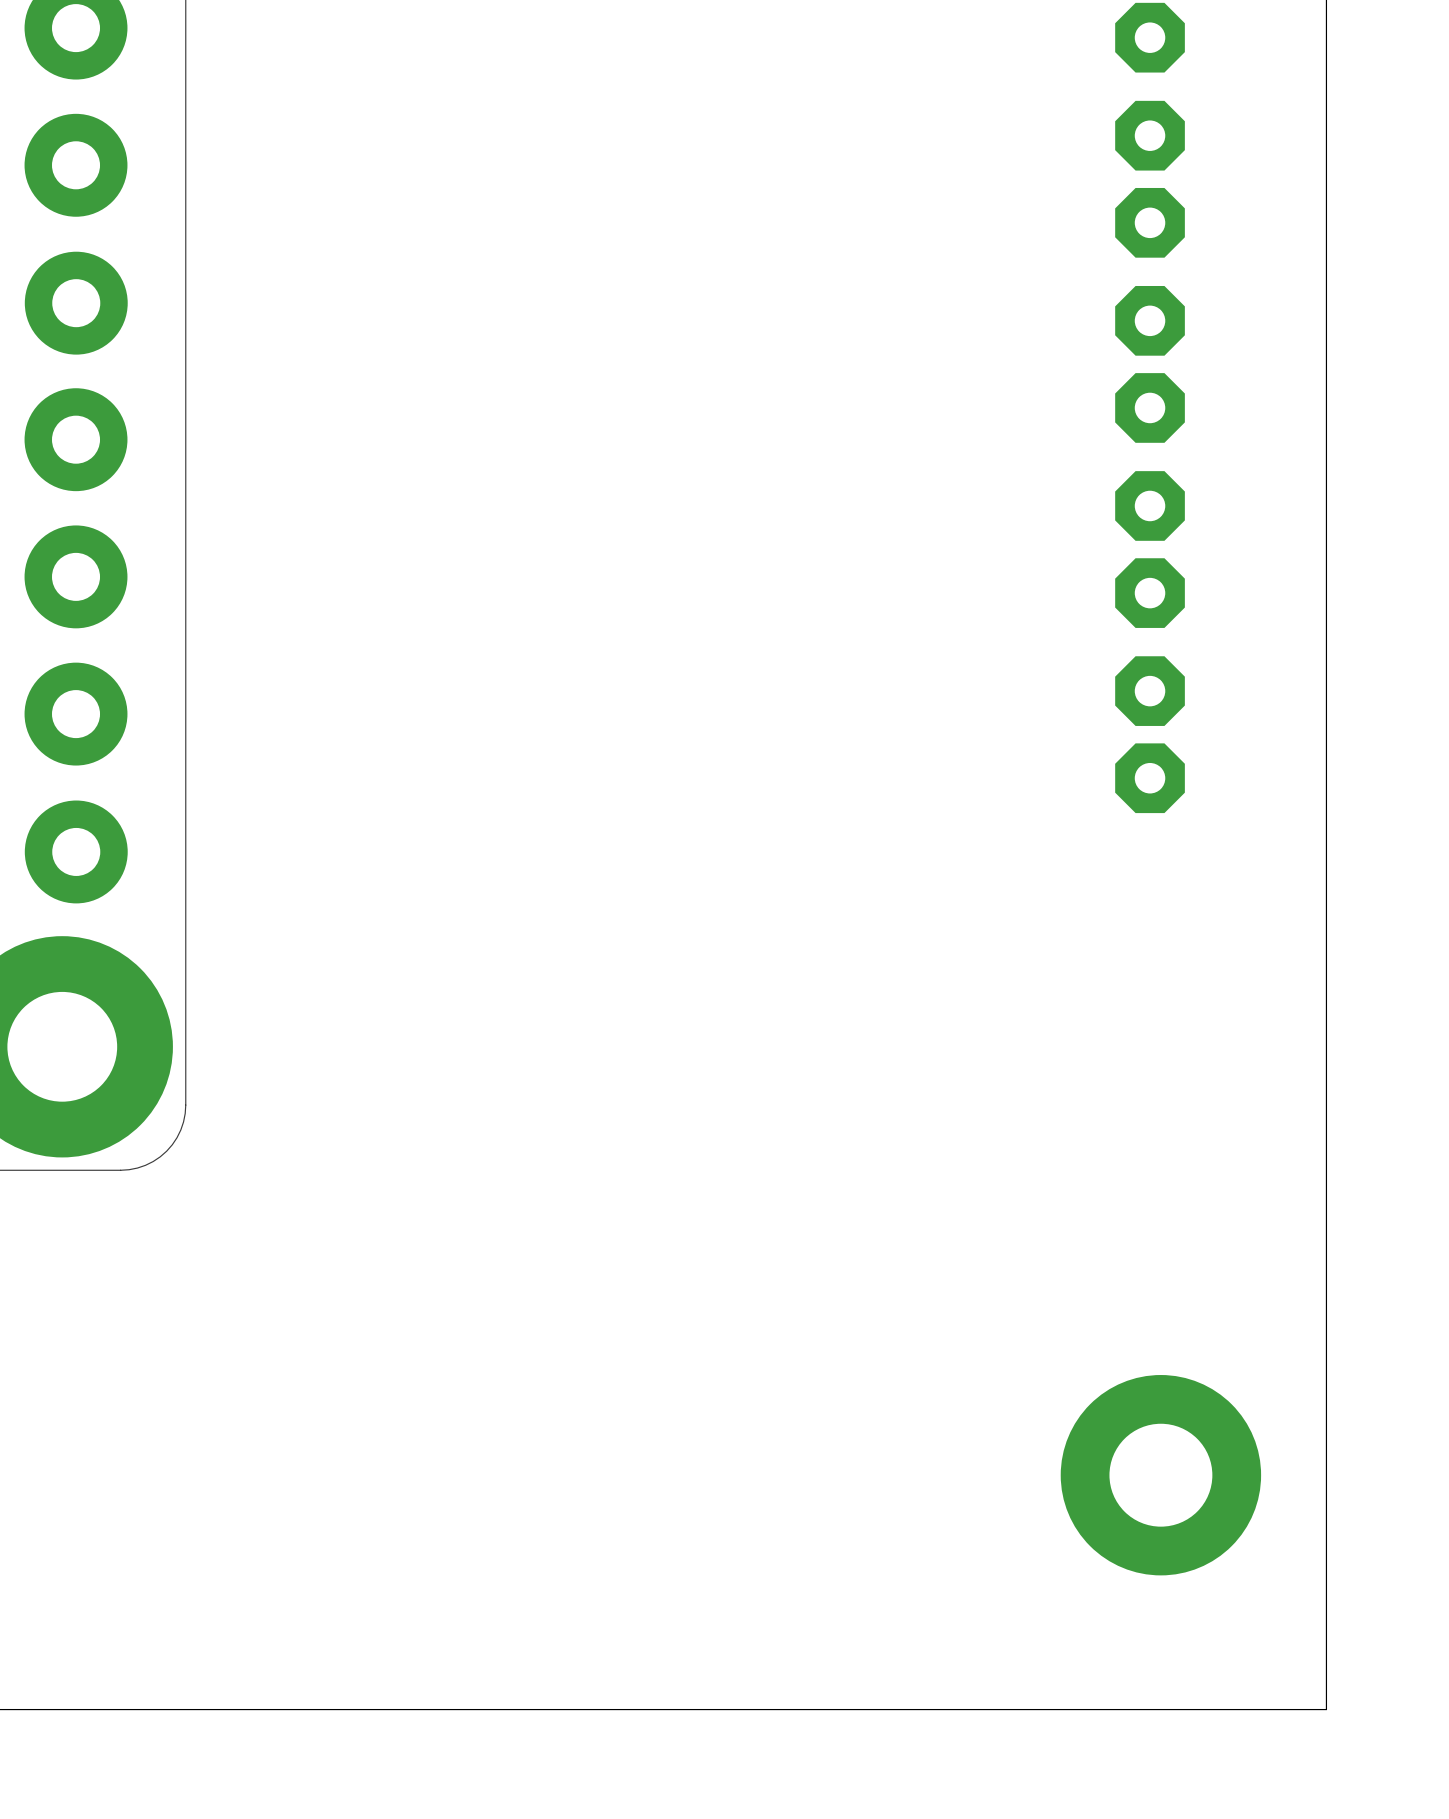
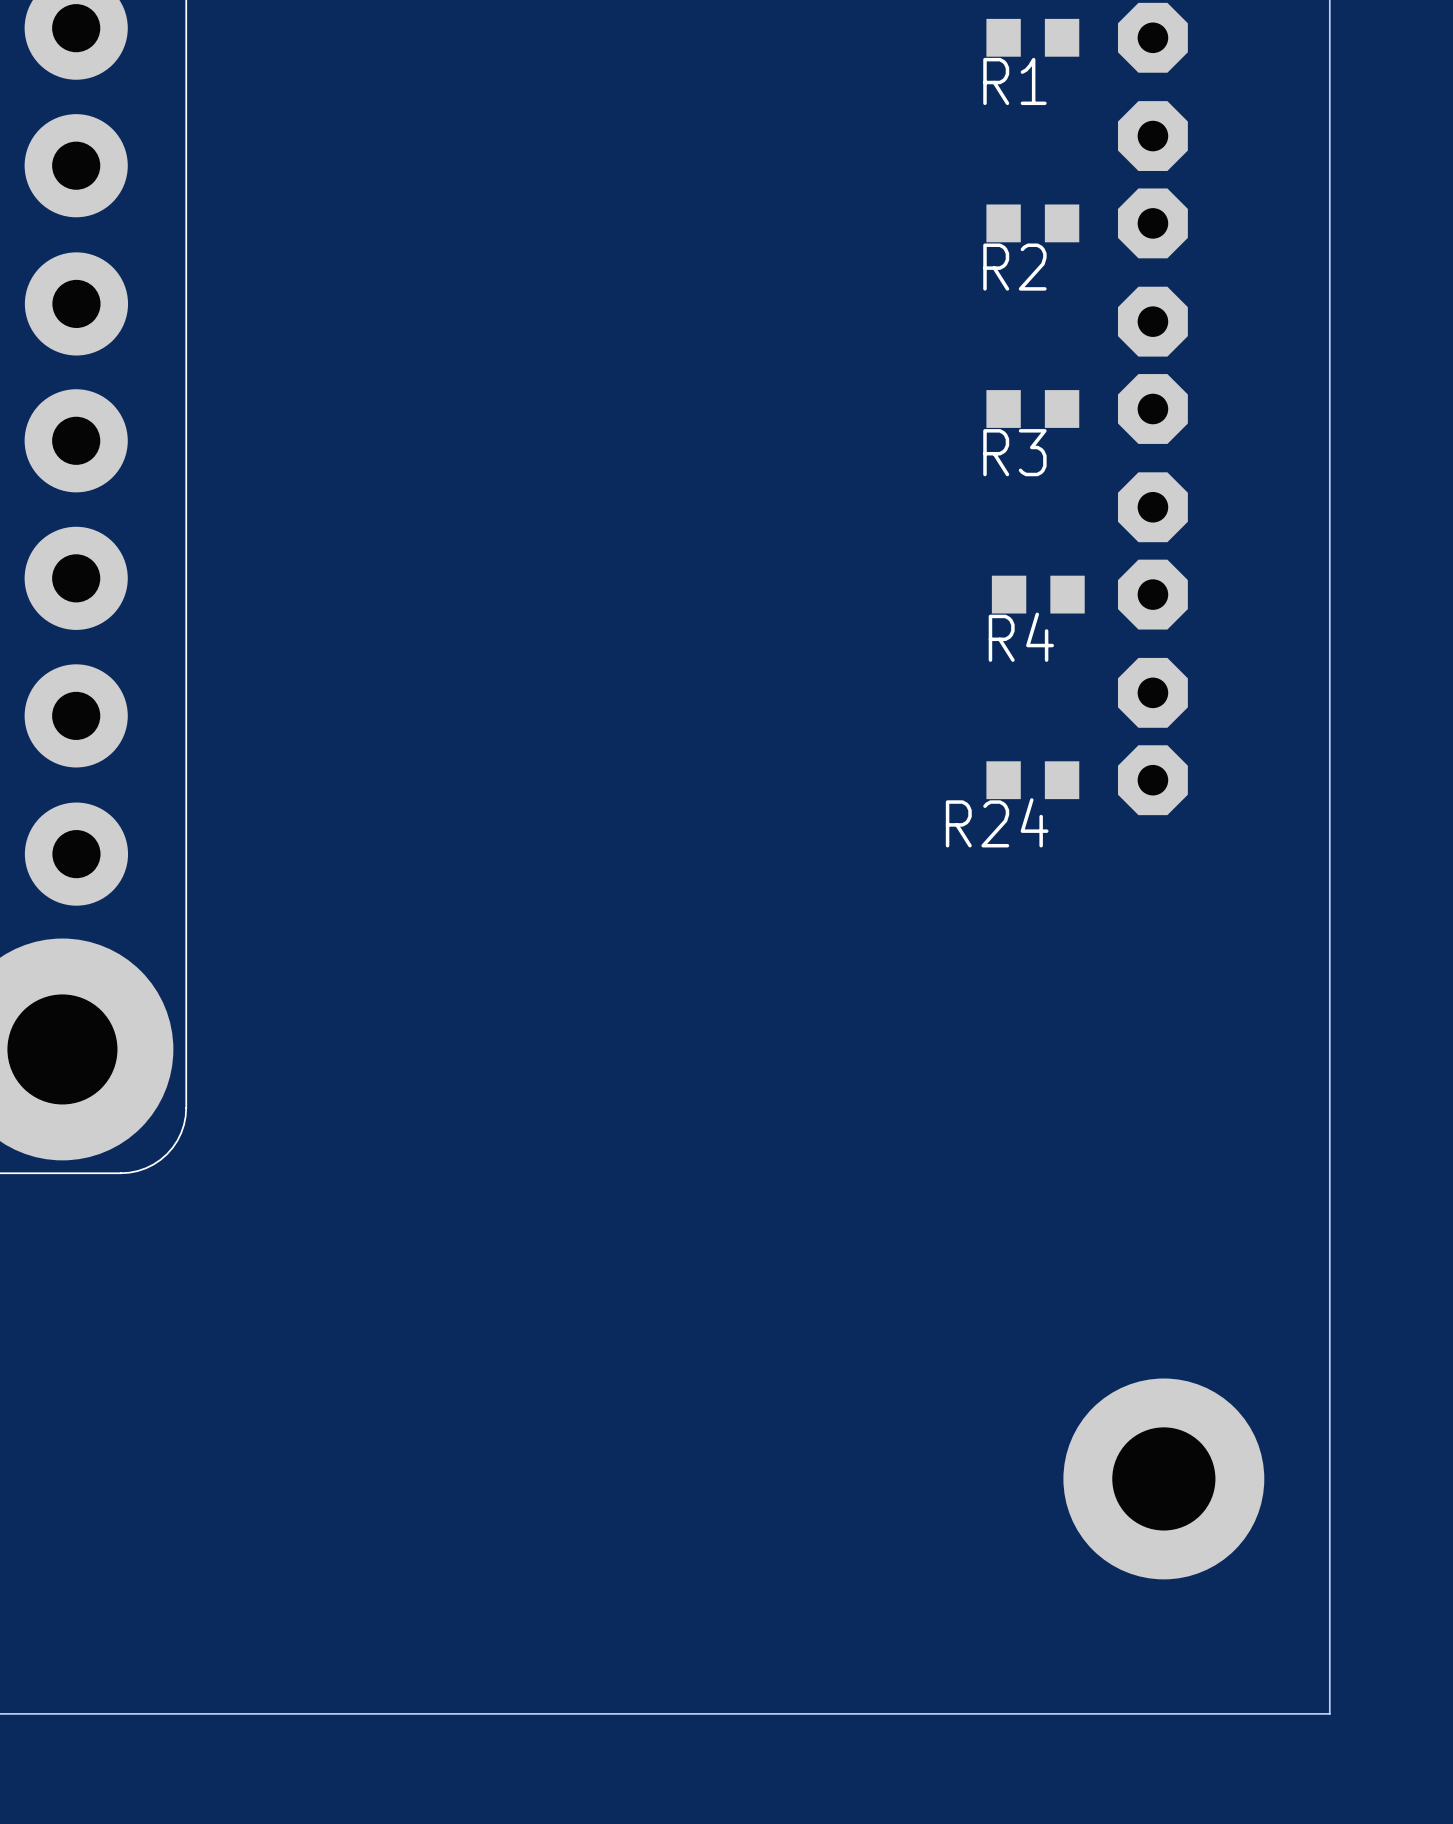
R1: none -> (1032, 37)
R2: none -> (1032, 223)
R3: none -> (1032, 408)
R4: none -> (1038, 594)
R24: none -> (1032, 780)

